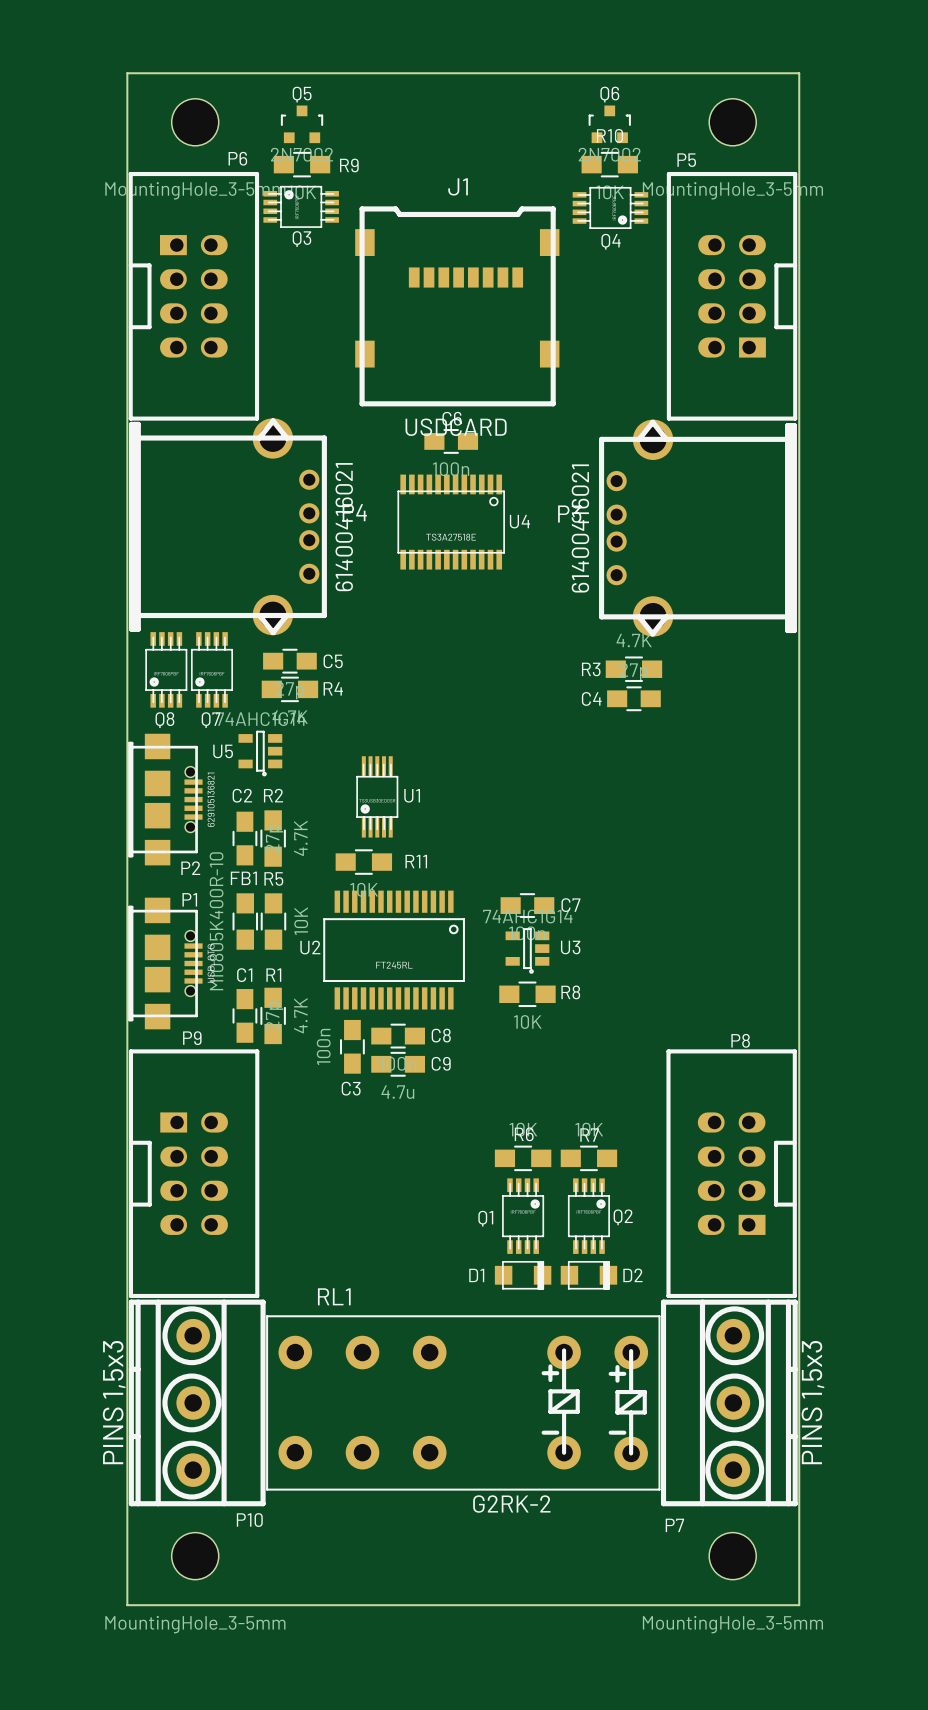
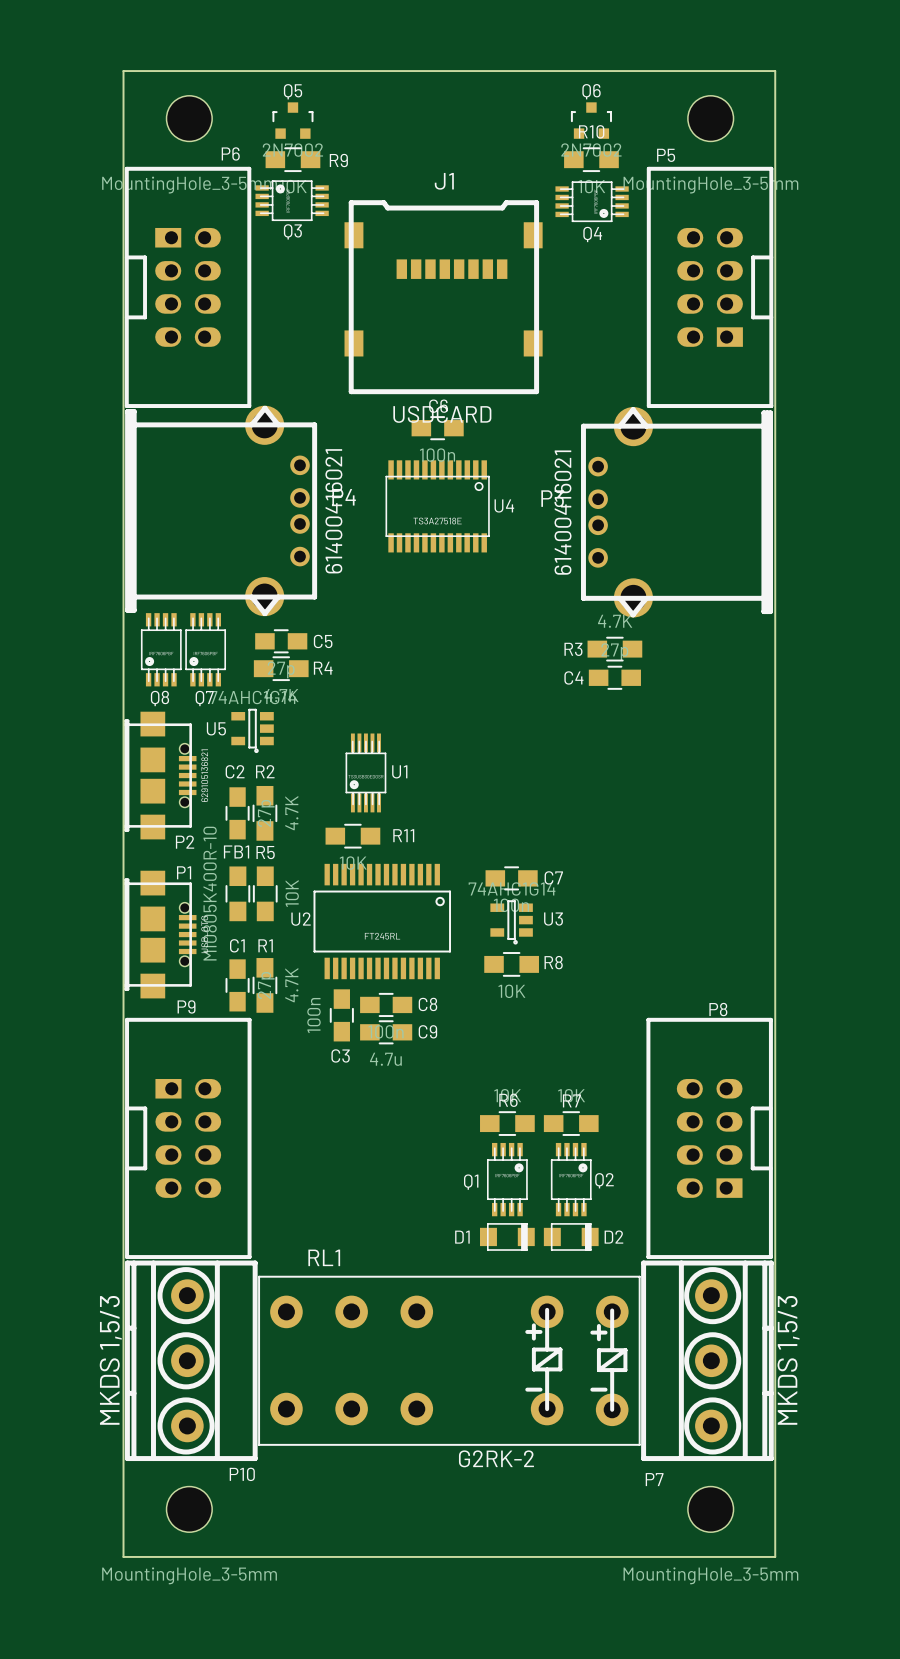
P10 value: PINS 1,5x3 (114, 1402) -> MKDS 1,5/3 (110, 1360)
P7 value: PINS 1,5x3 (812, 1402) -> MKDS 1,5/3 (788, 1360)

